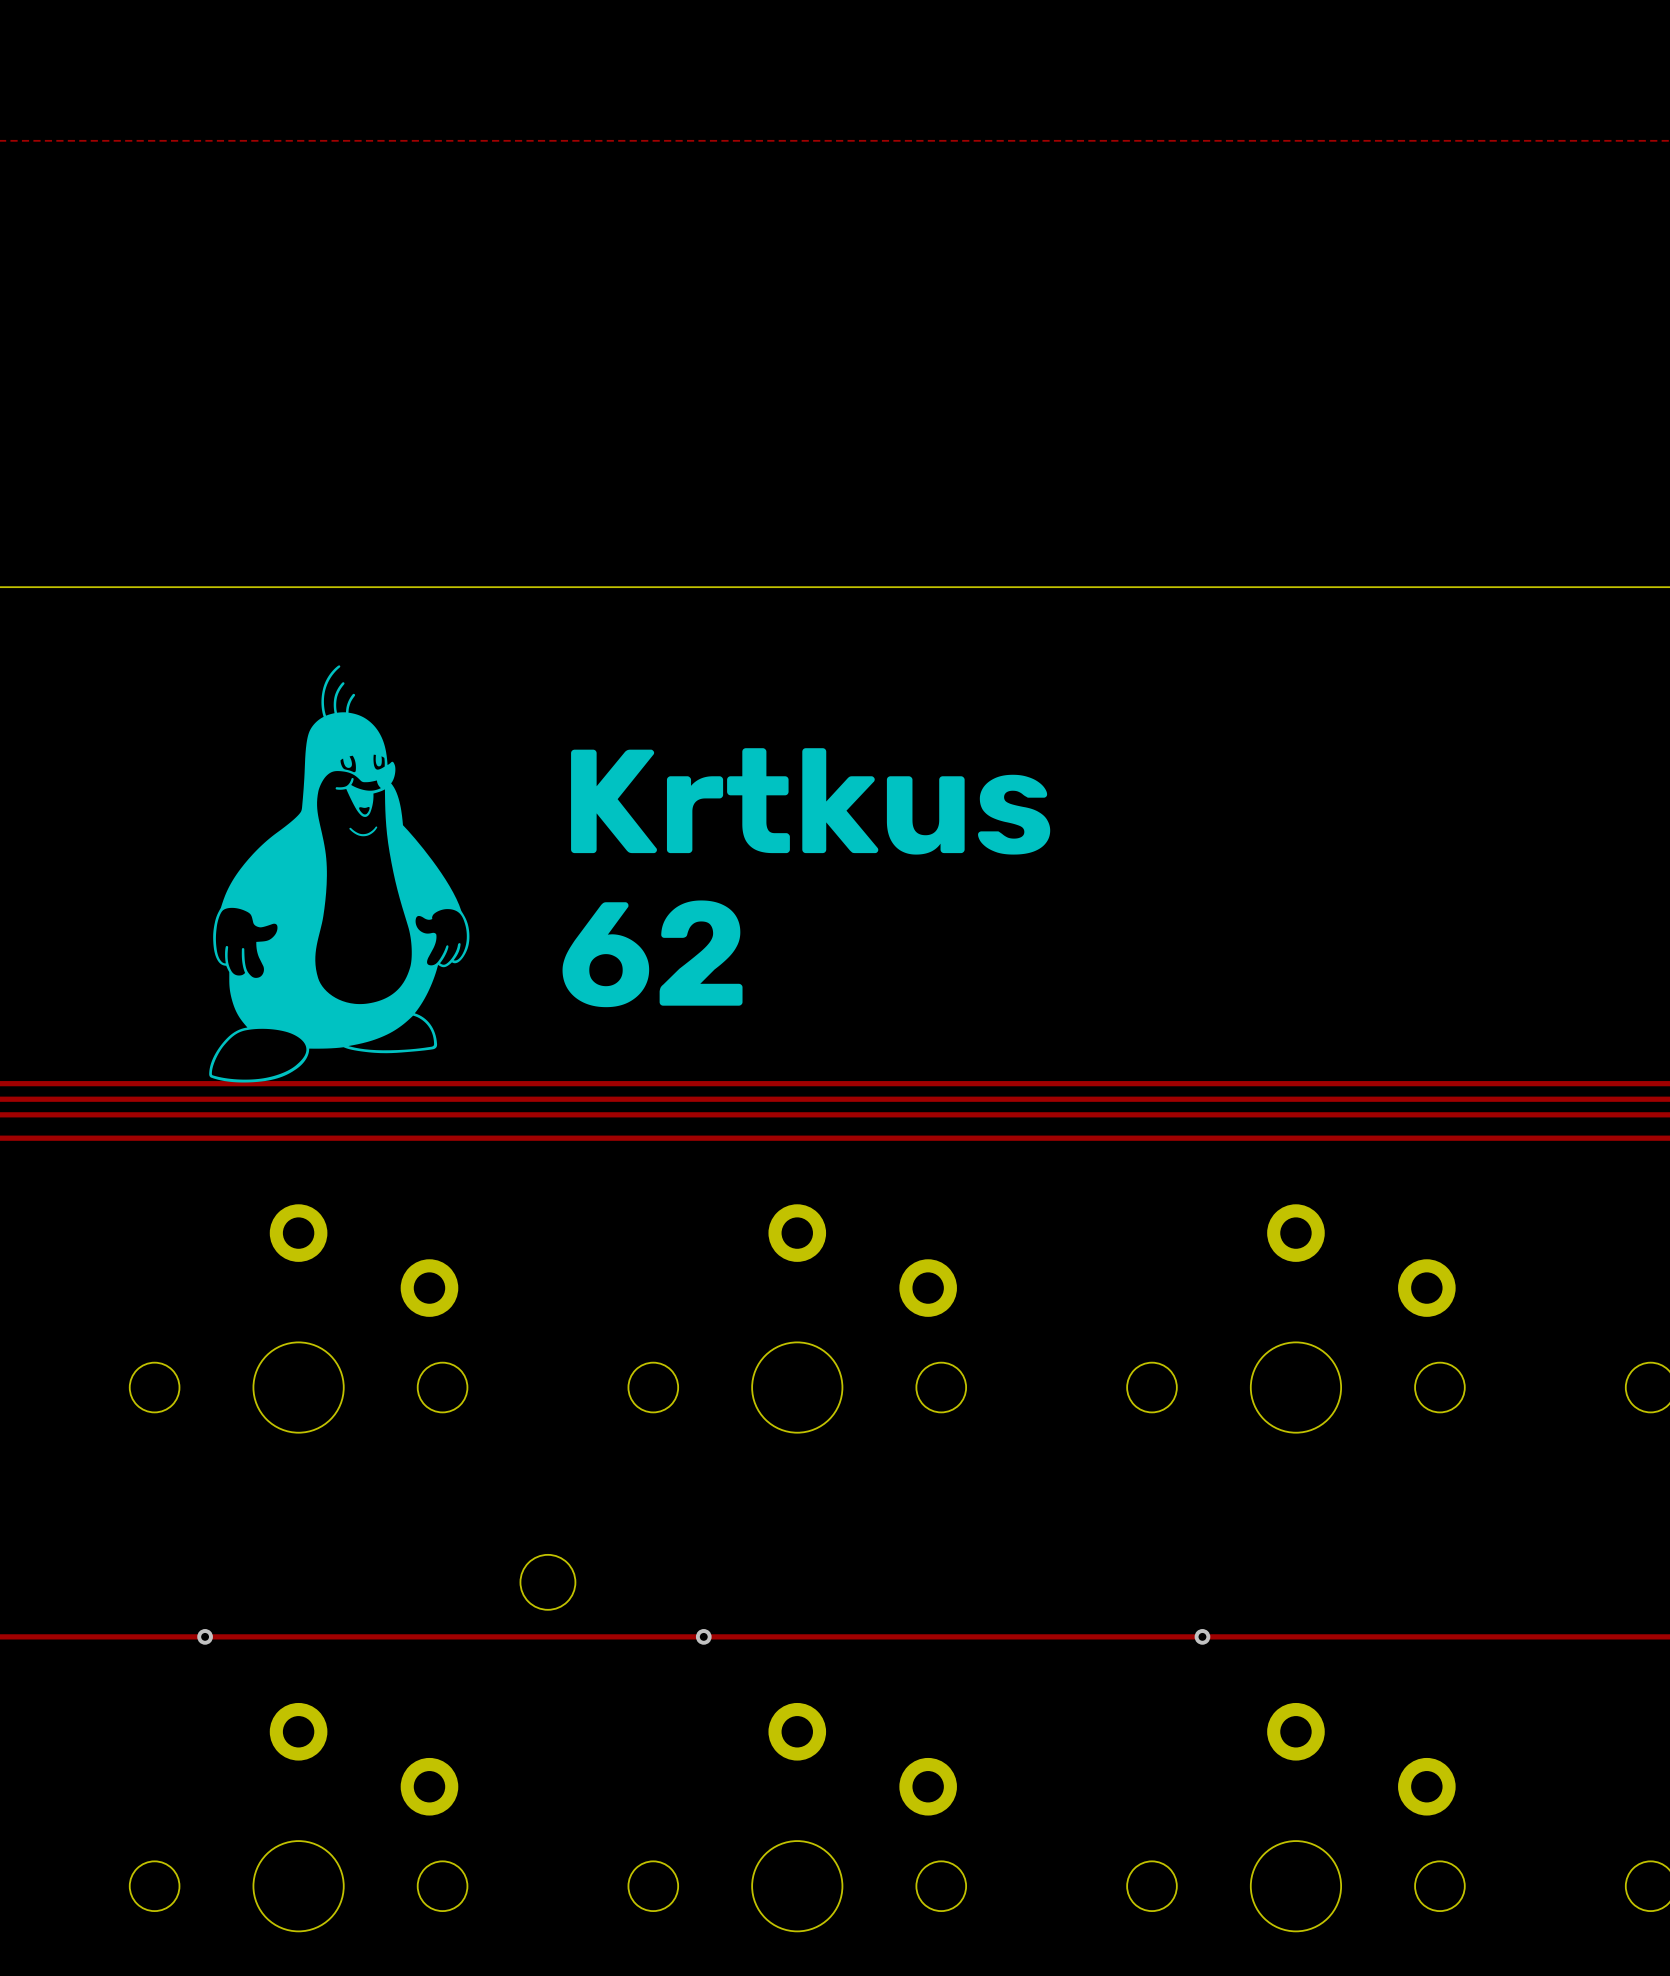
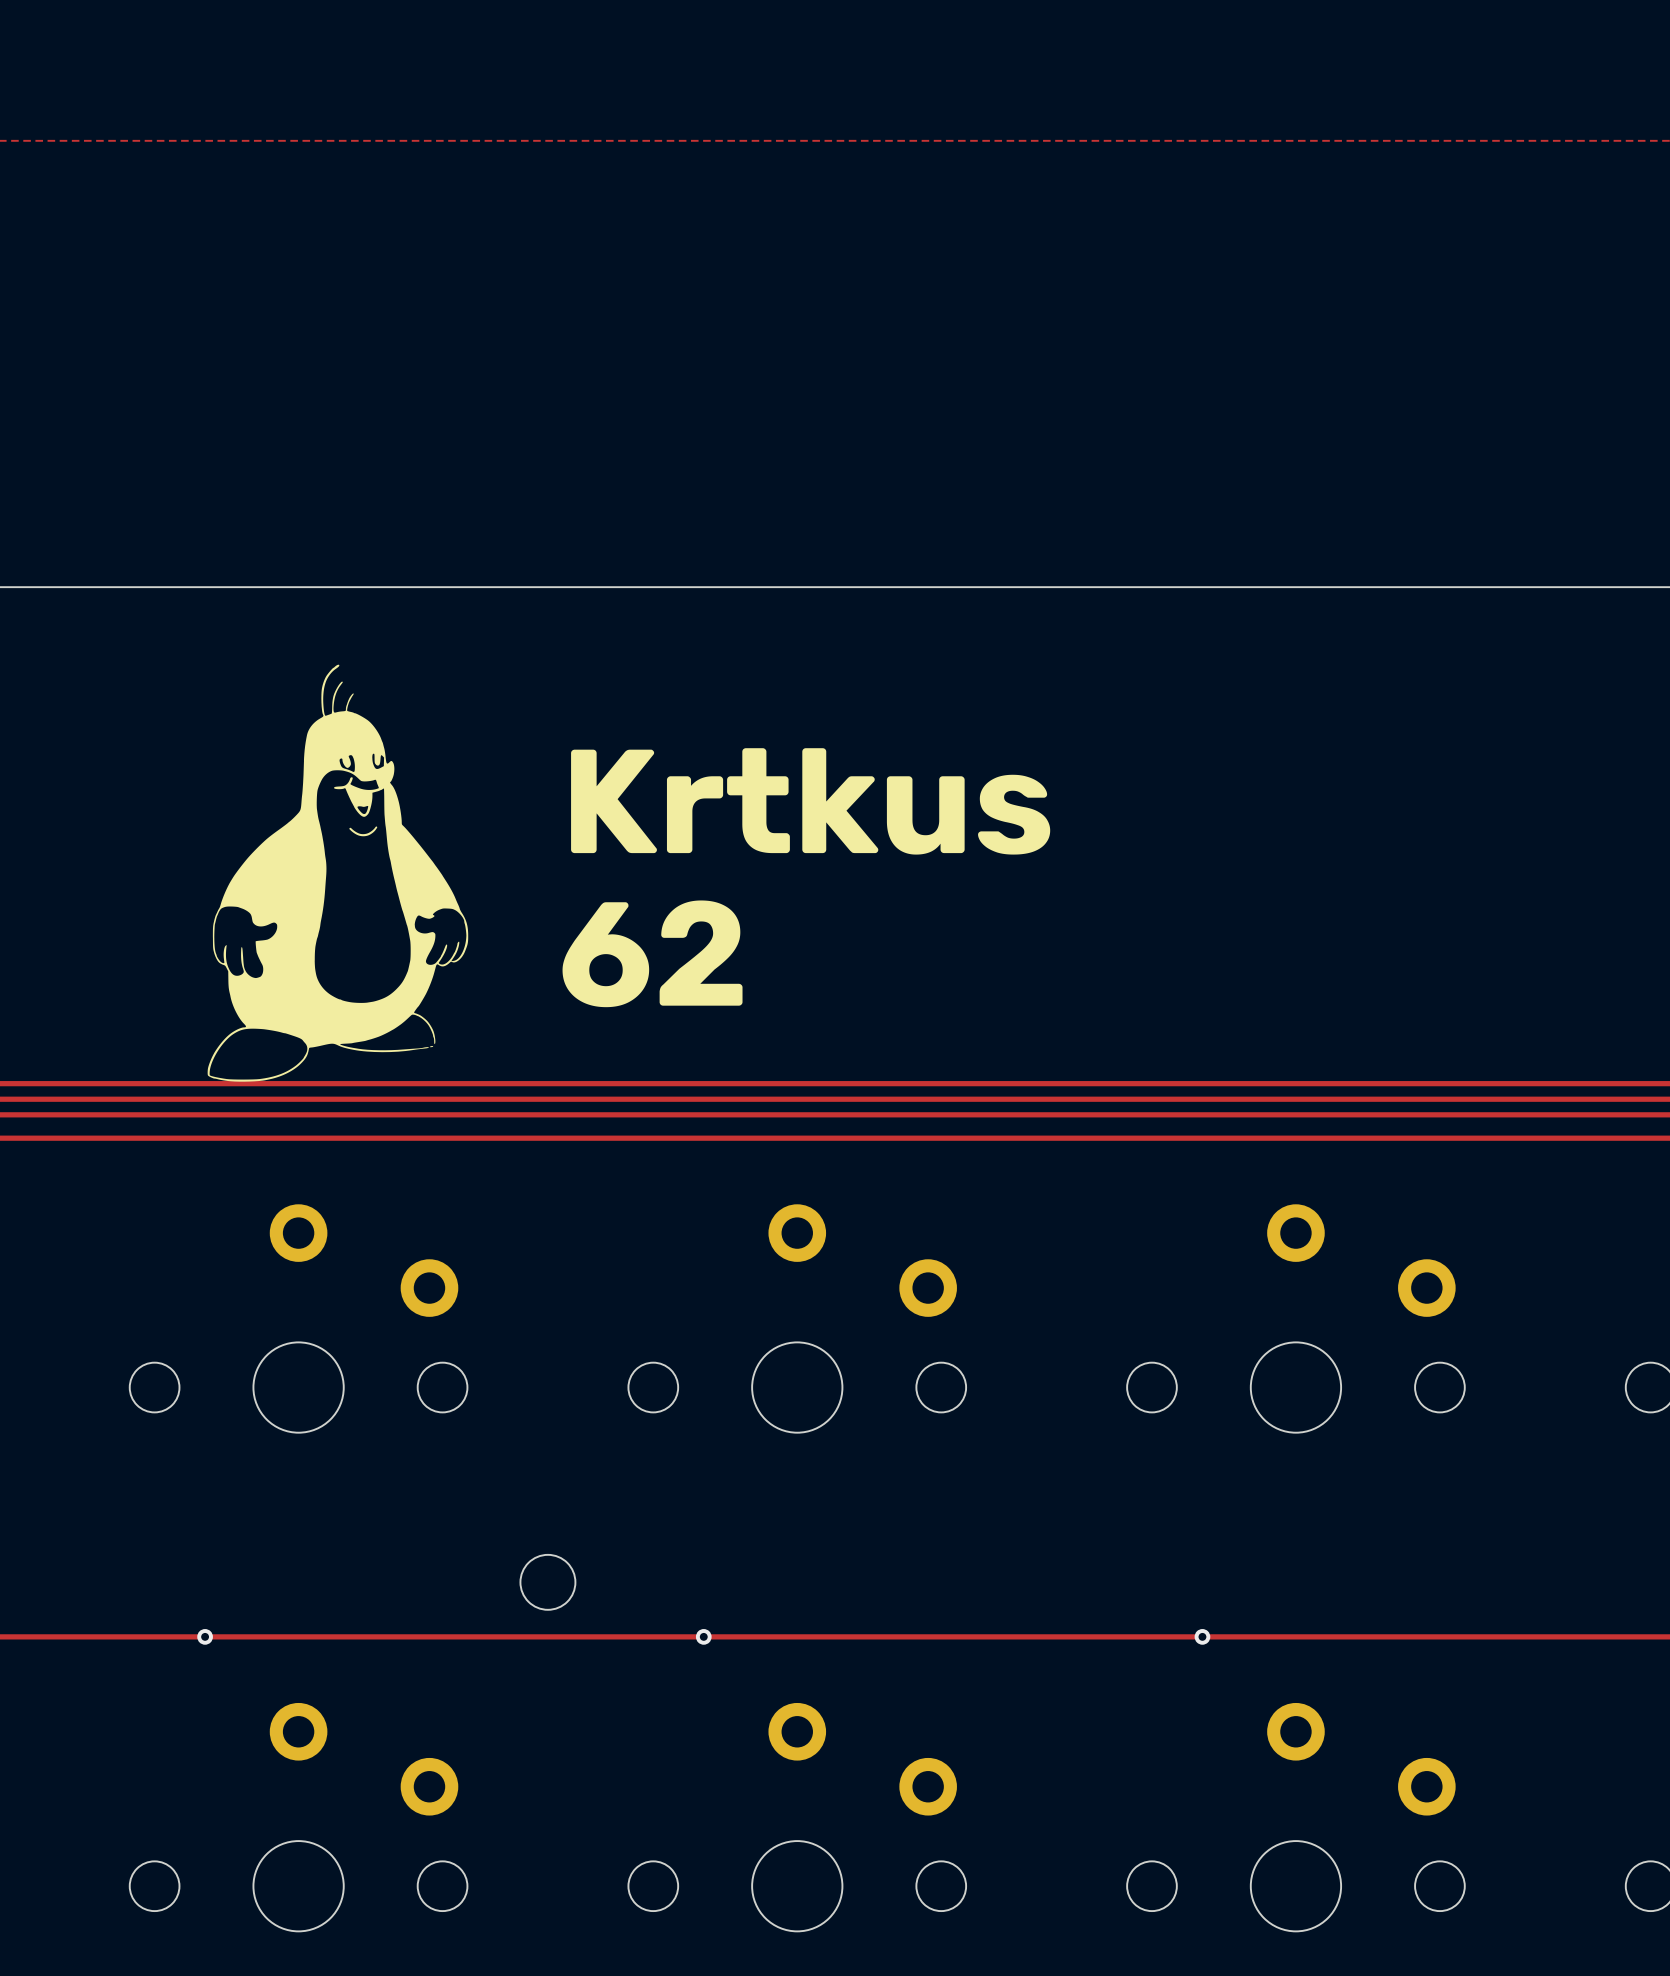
drawing shape: [209, 665, 470, 1083] -> [207, 664, 469, 1082]
drawing: none -> [429, 1046, 434, 1048]

